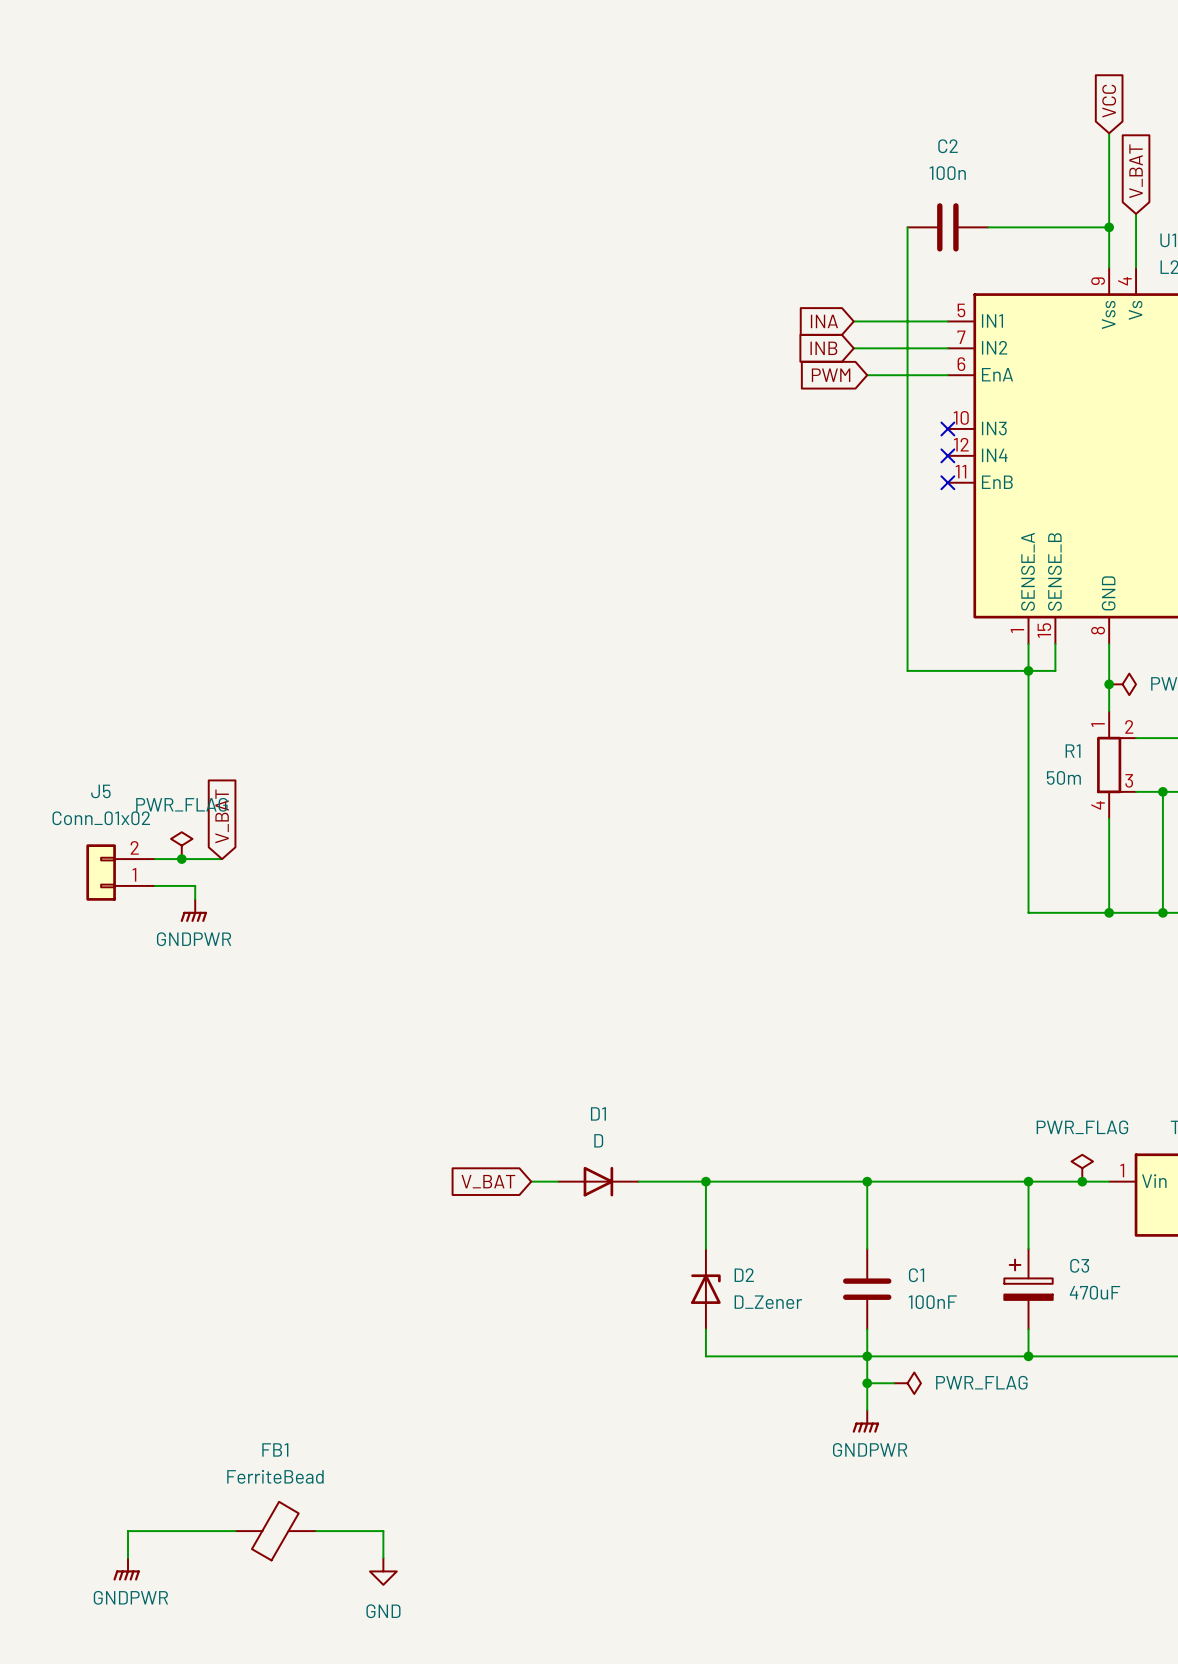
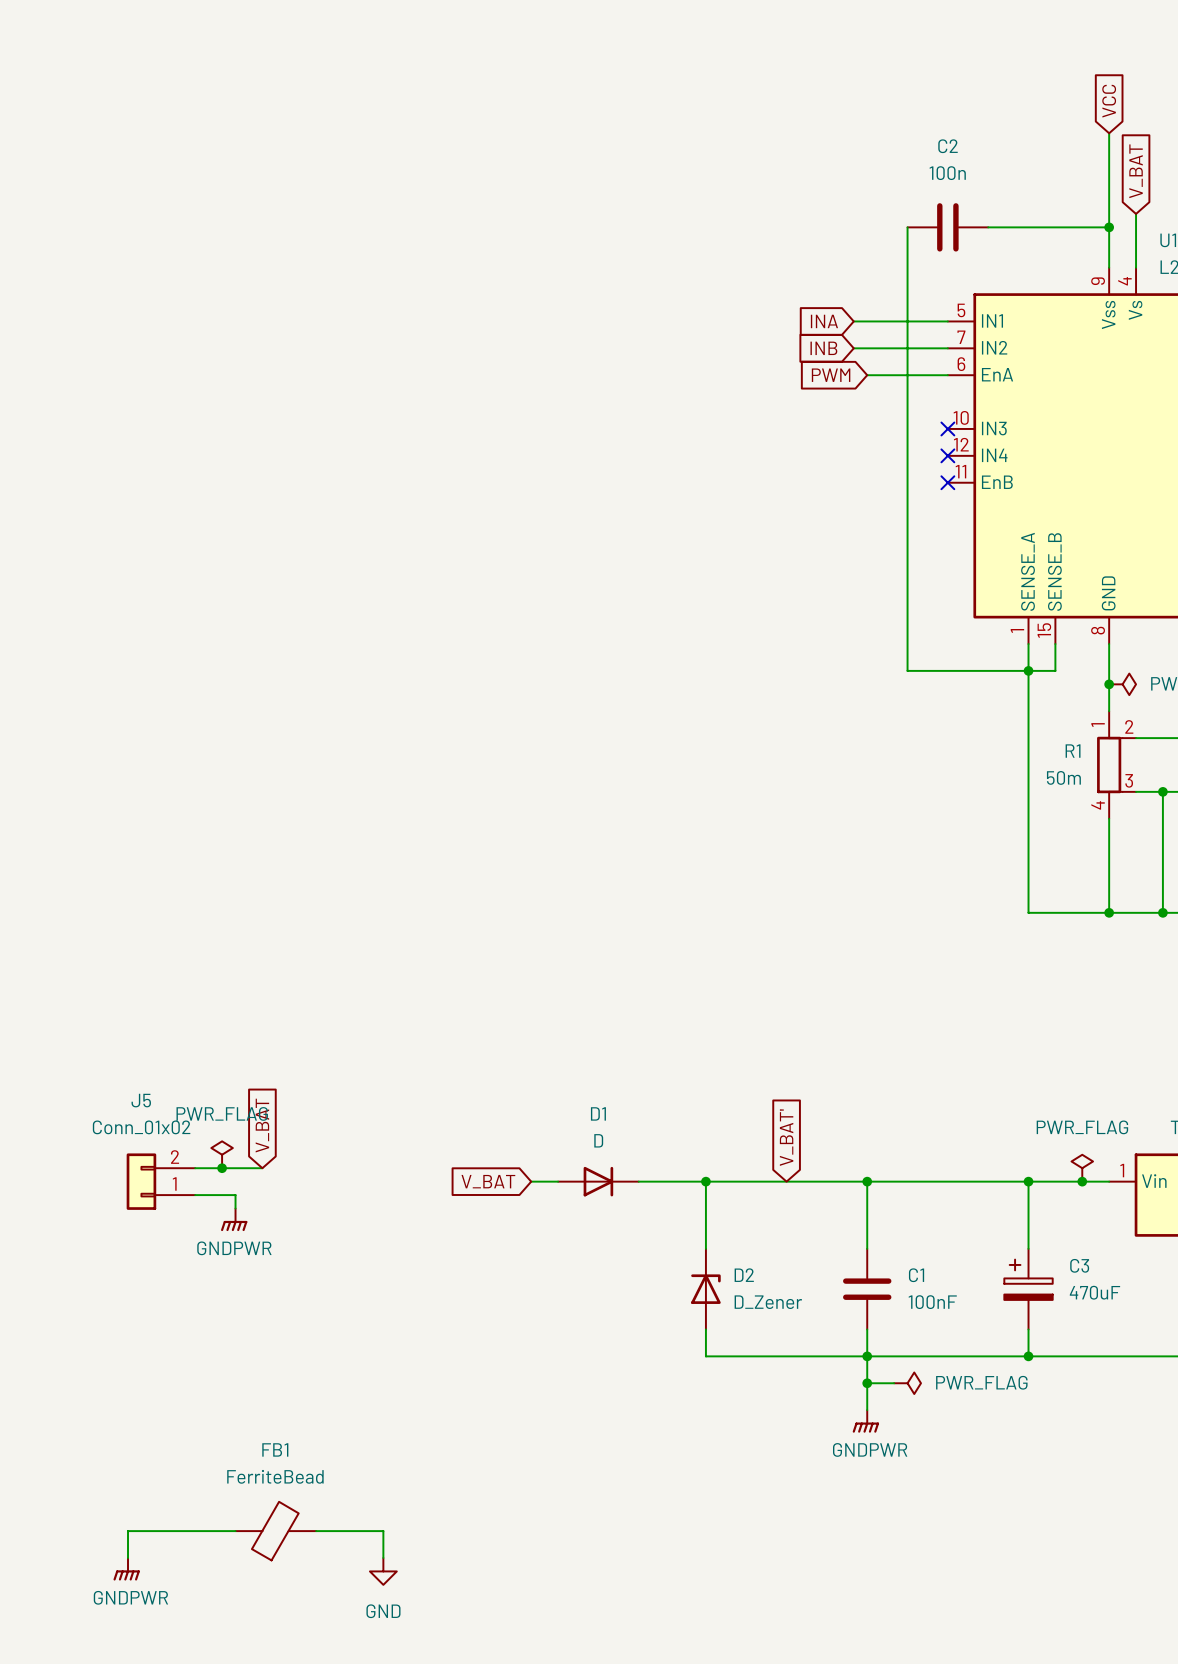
global label: V_BAT (222, 816) -> none
power symbol: PWR_FLAG (181, 845) -> none
wire: (154, 859) (222, 859) -> none
junction: (181, 859) -> none
J5 position: (120, 872) -> (160, 1181)
wire: (154, 885) (195, 885) (195, 899) -> none
power symbol: GNDPWR (193, 910) -> none
global label: none -> V_BAT (262, 1125)
global label: none -> V_BAT' (786, 1137)
power symbol: none -> PWR_FLAG (222, 1154)
wire: none -> (195, 1168) (262, 1168)
junction: none -> (222, 1168)
wire: none -> (195, 1195) (235, 1195) (235, 1208)
power symbol: none -> GNDPWR (234, 1219)

